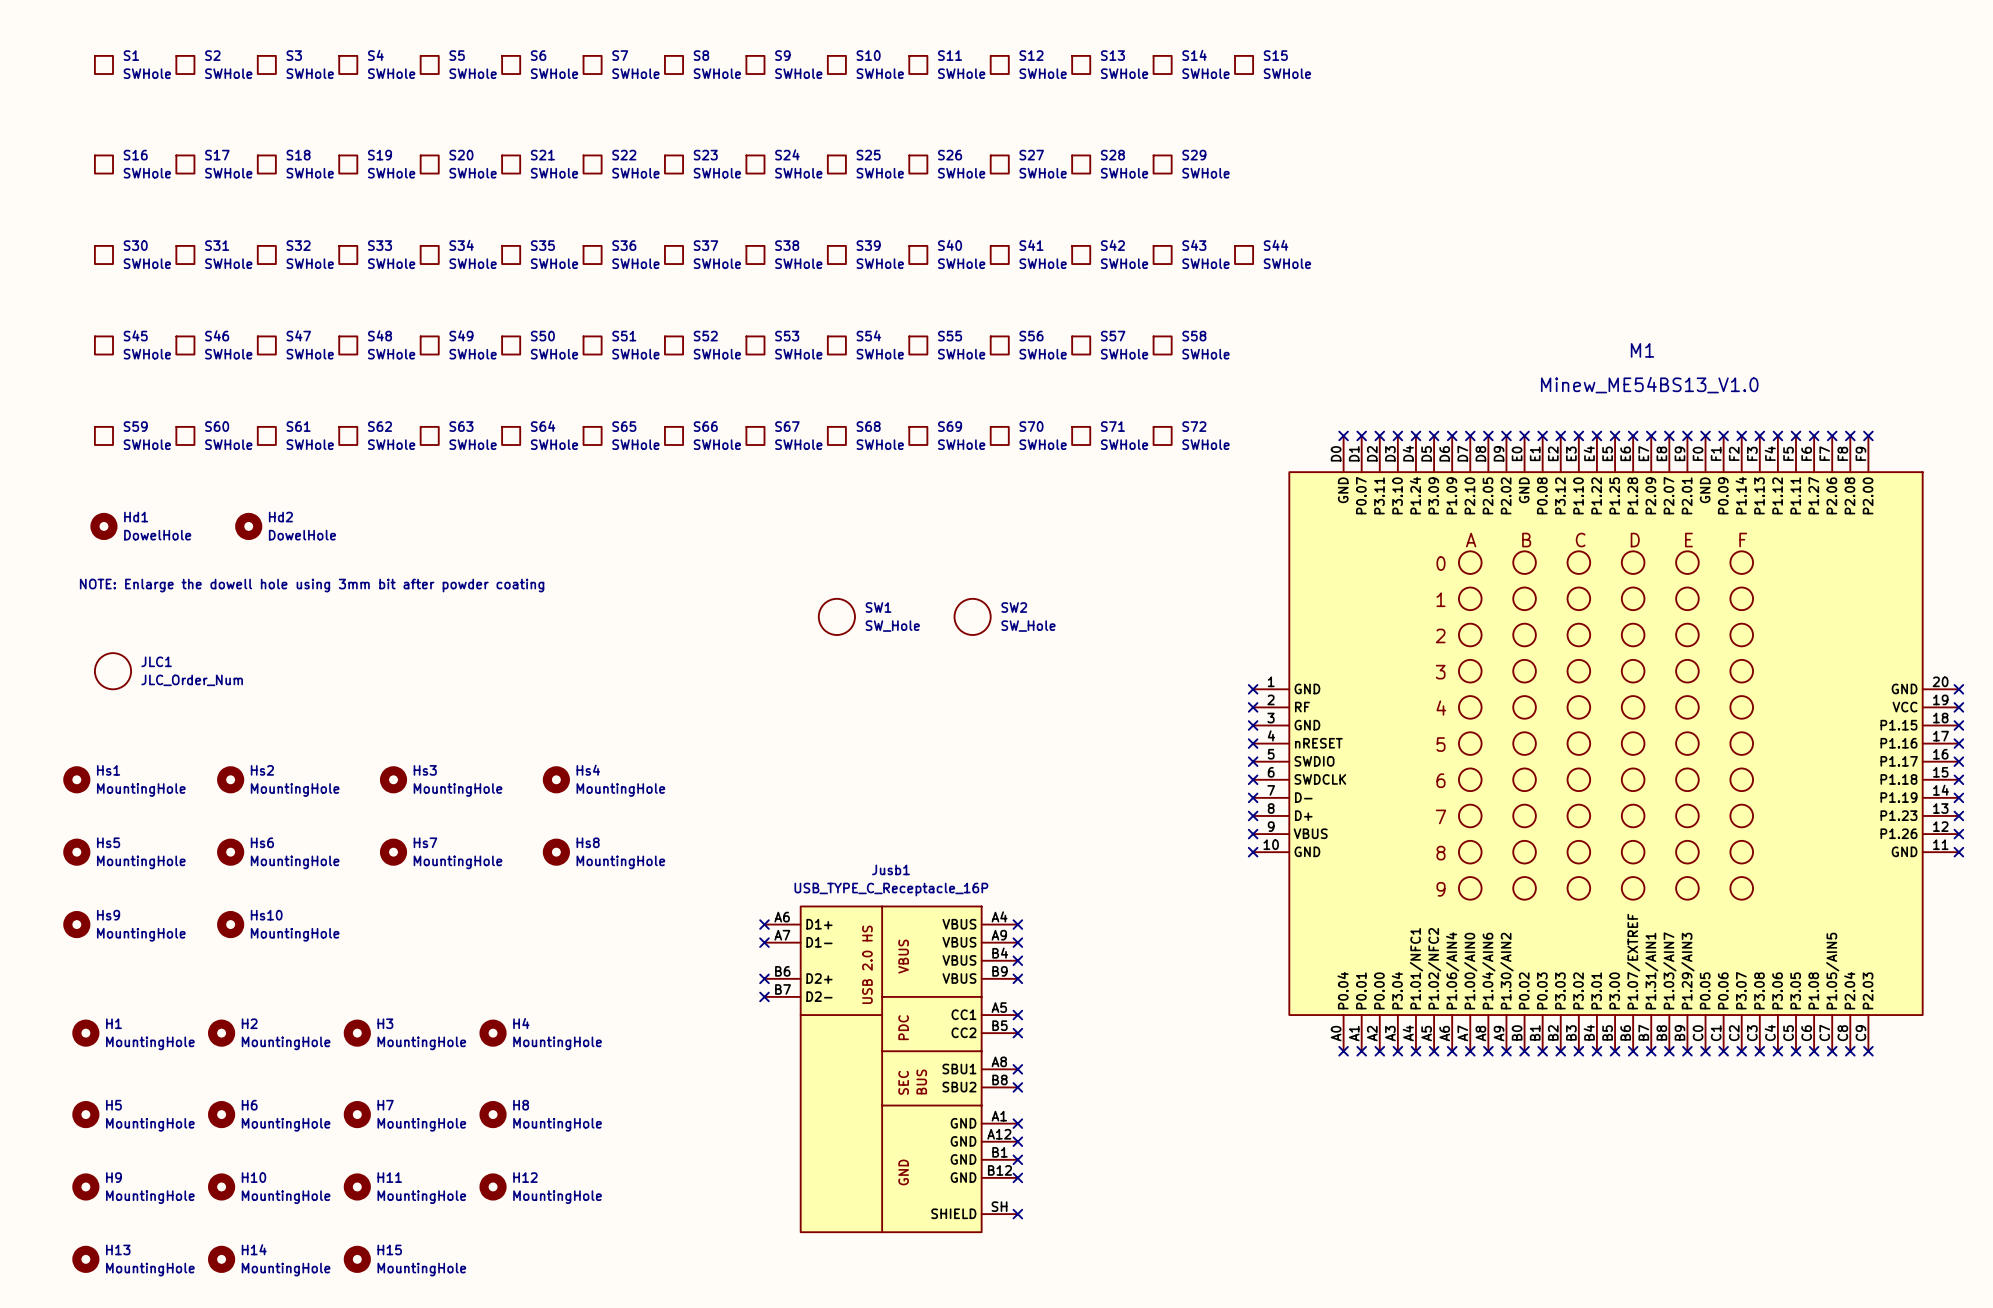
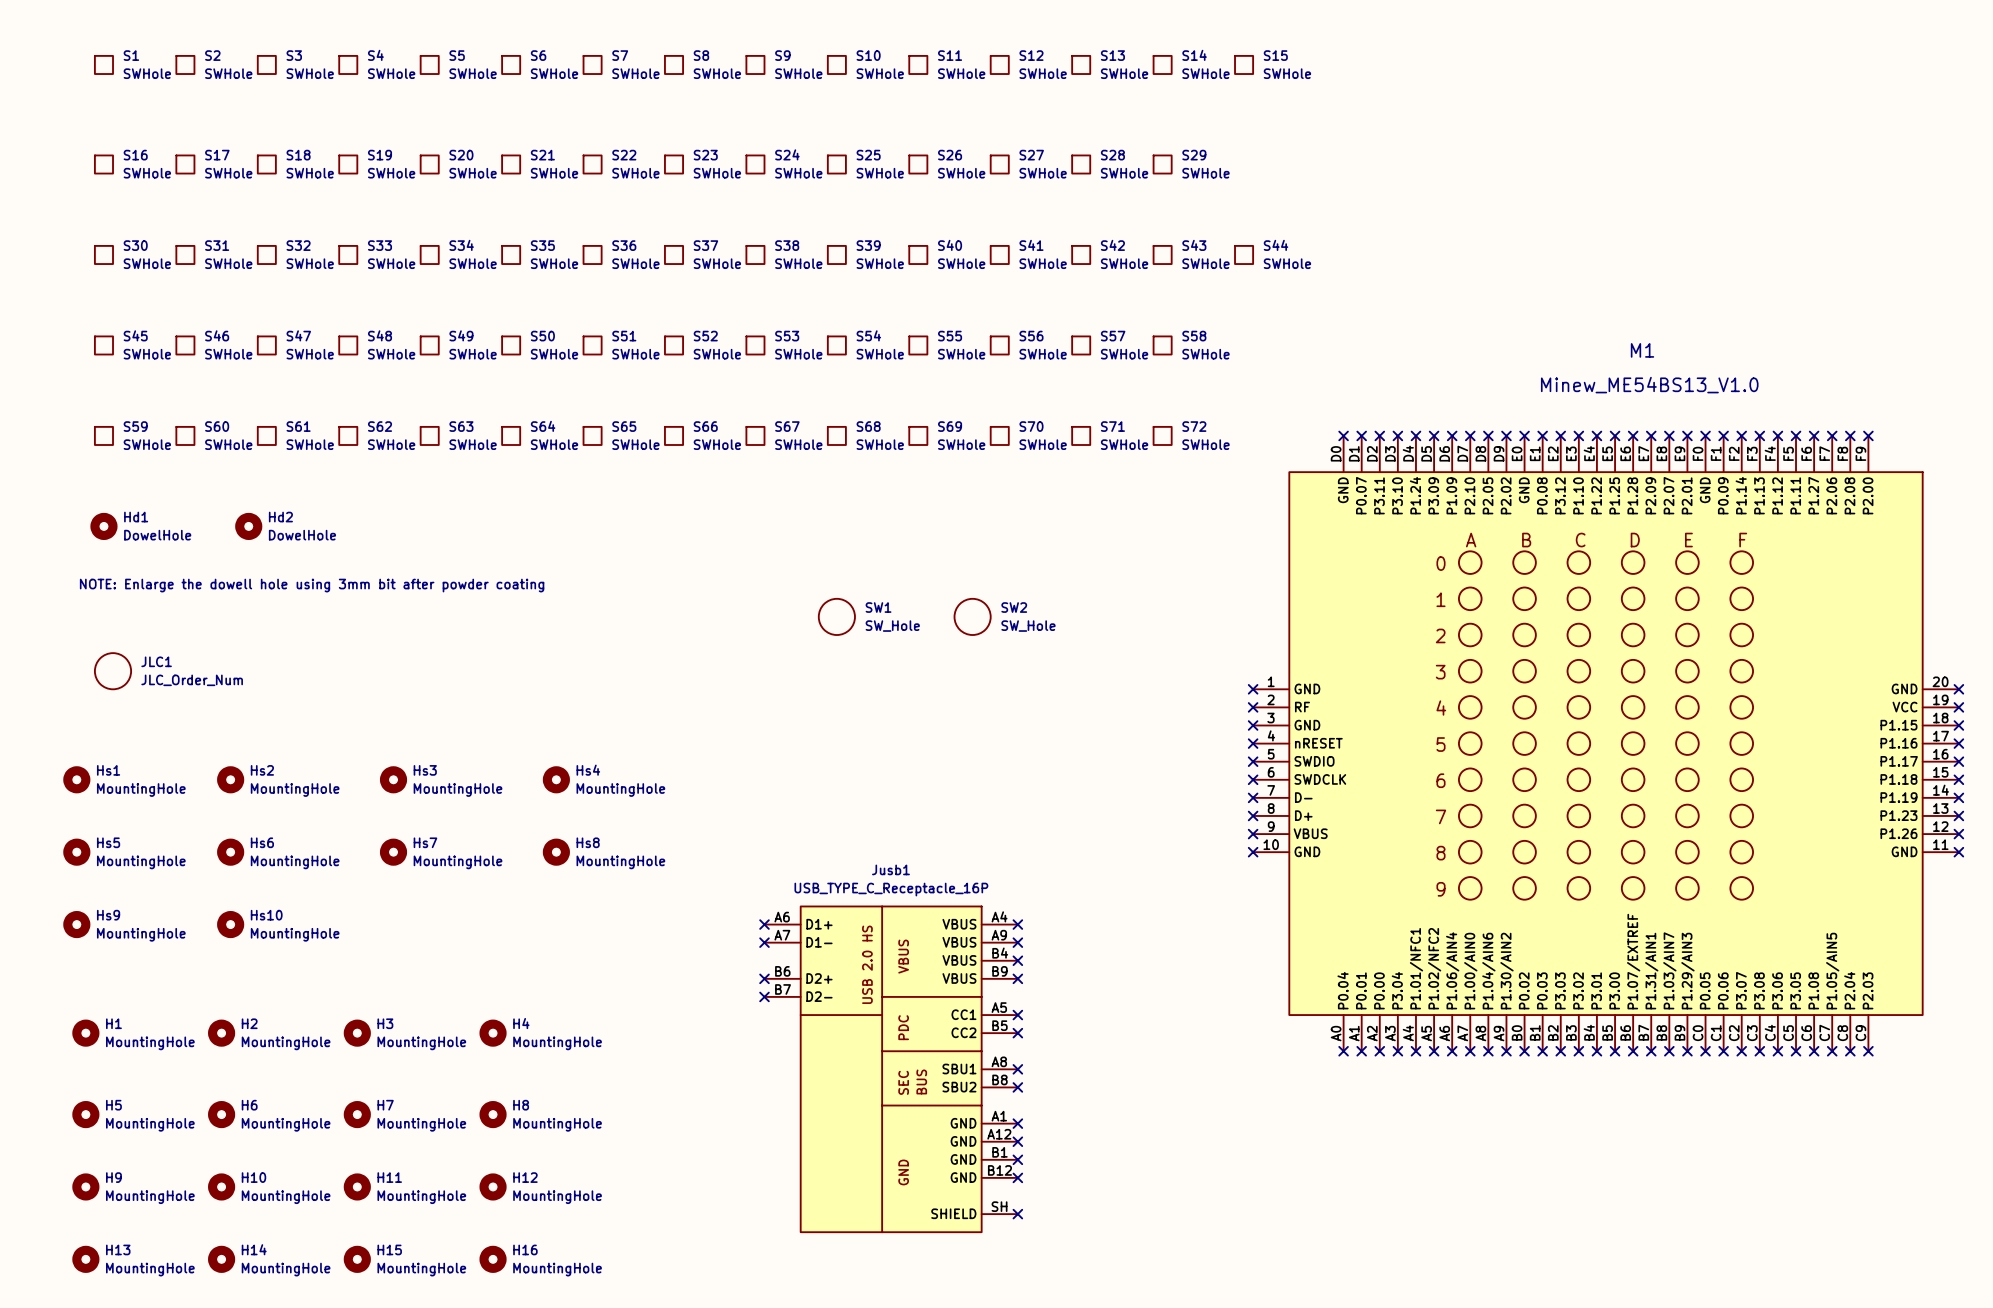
H16: none -> MountingHole (493, 1259)

